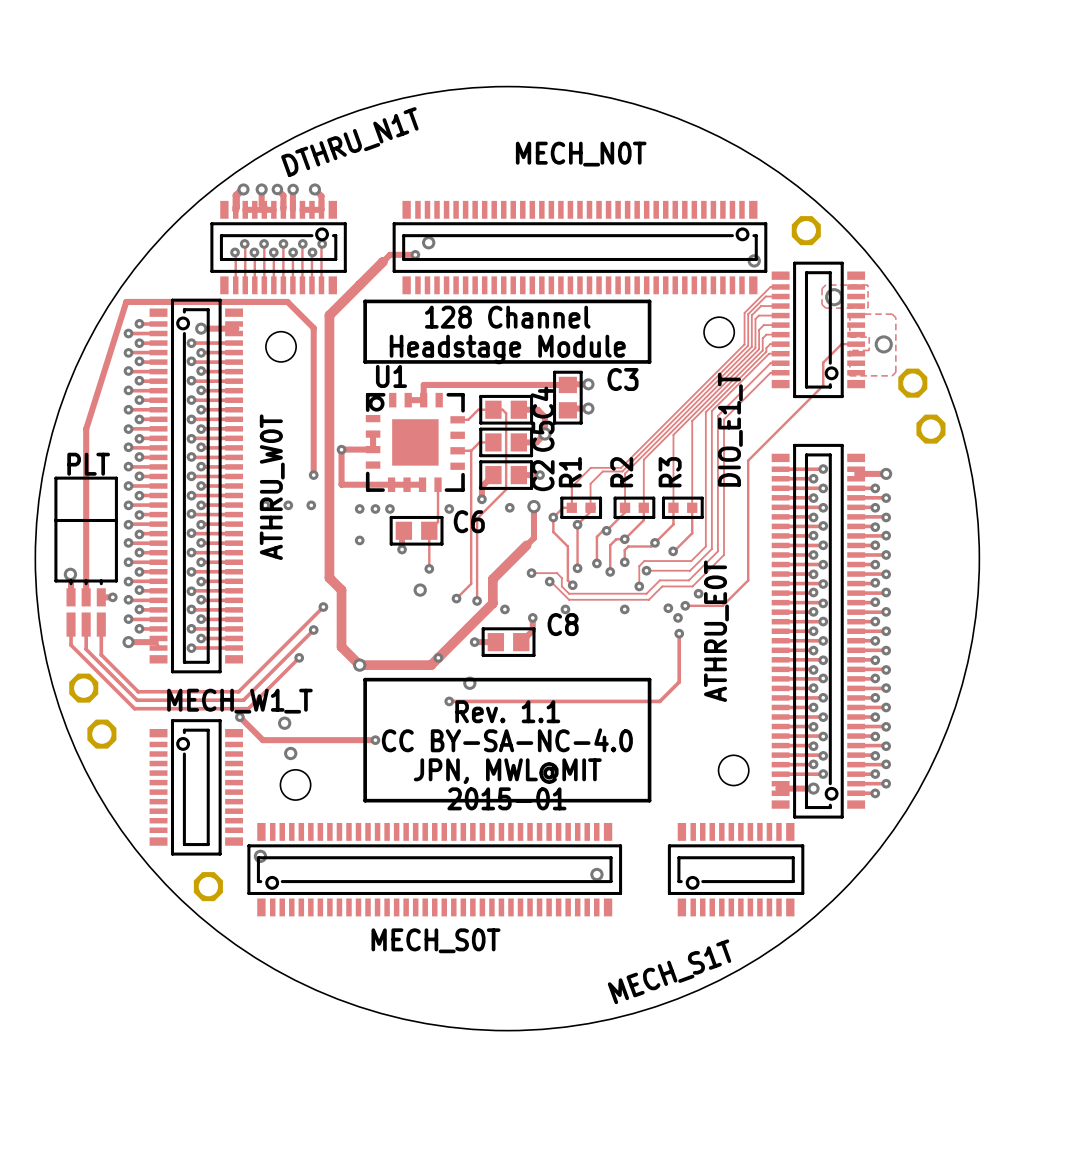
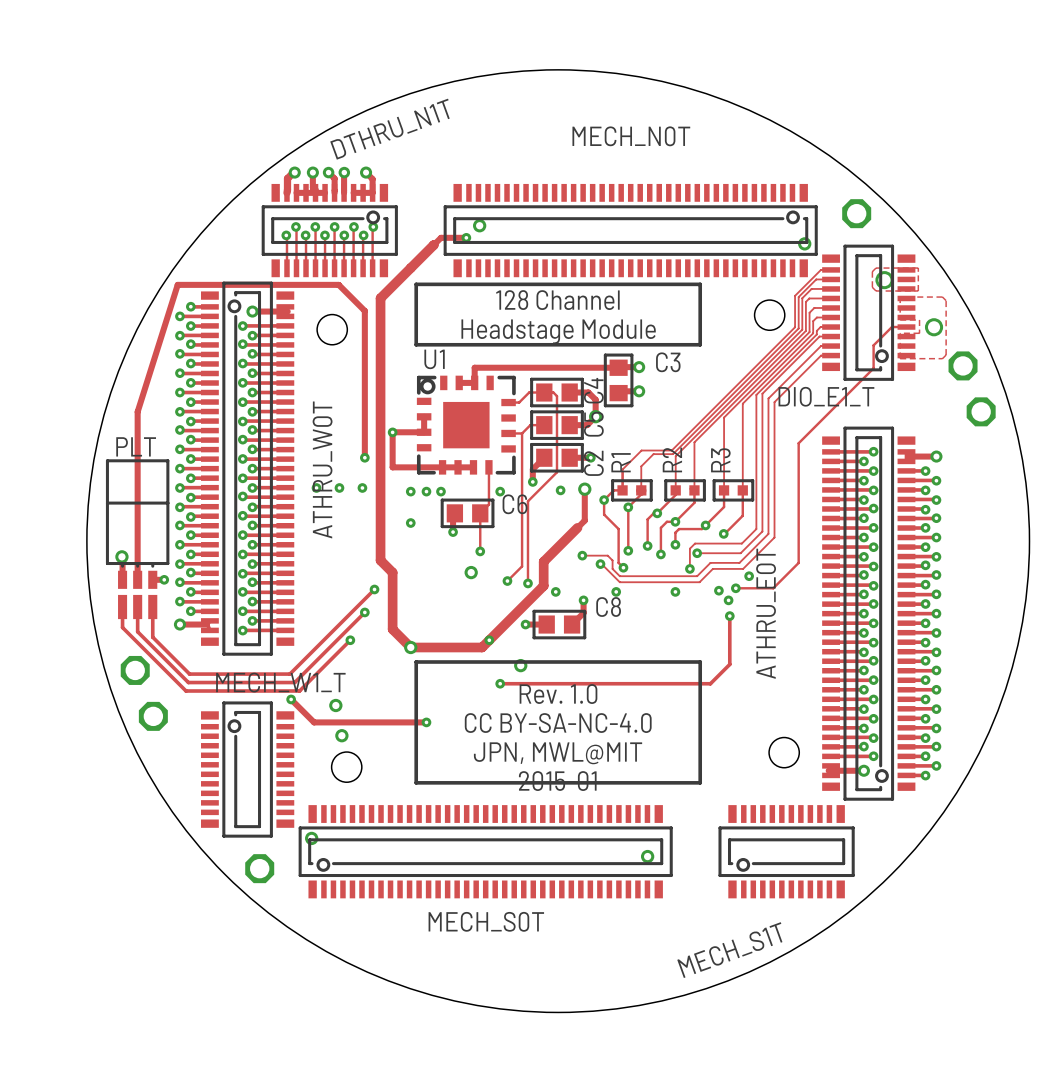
DIO_E1_T name rotation: 0° (730, 429) -> 90° clockwise (826, 396)
text: Rev. 1.1 (507, 711) -> Rev. 1.0 (558, 694)

